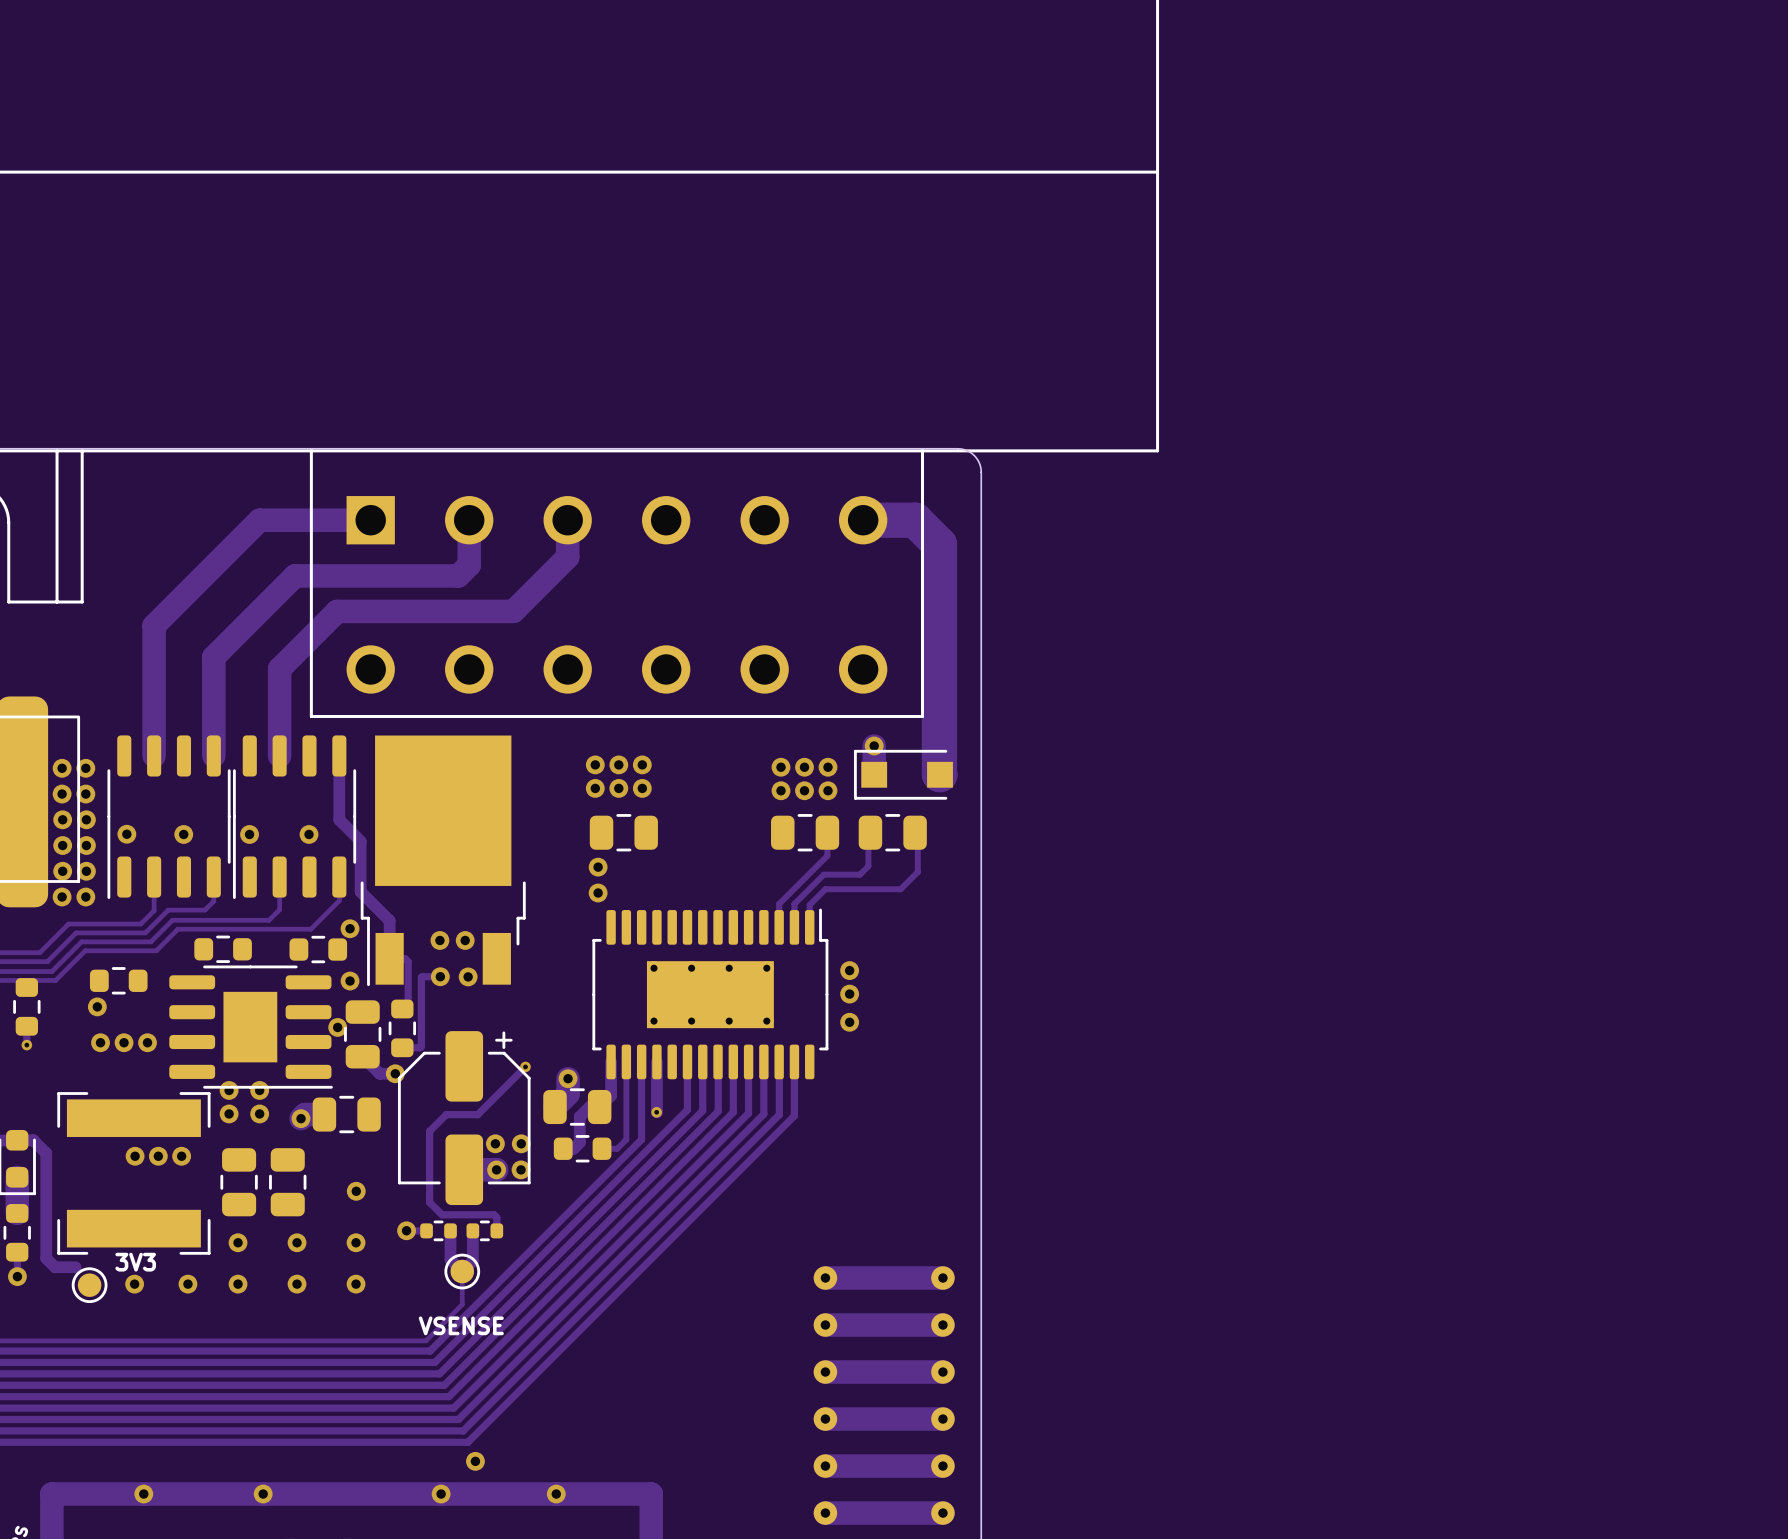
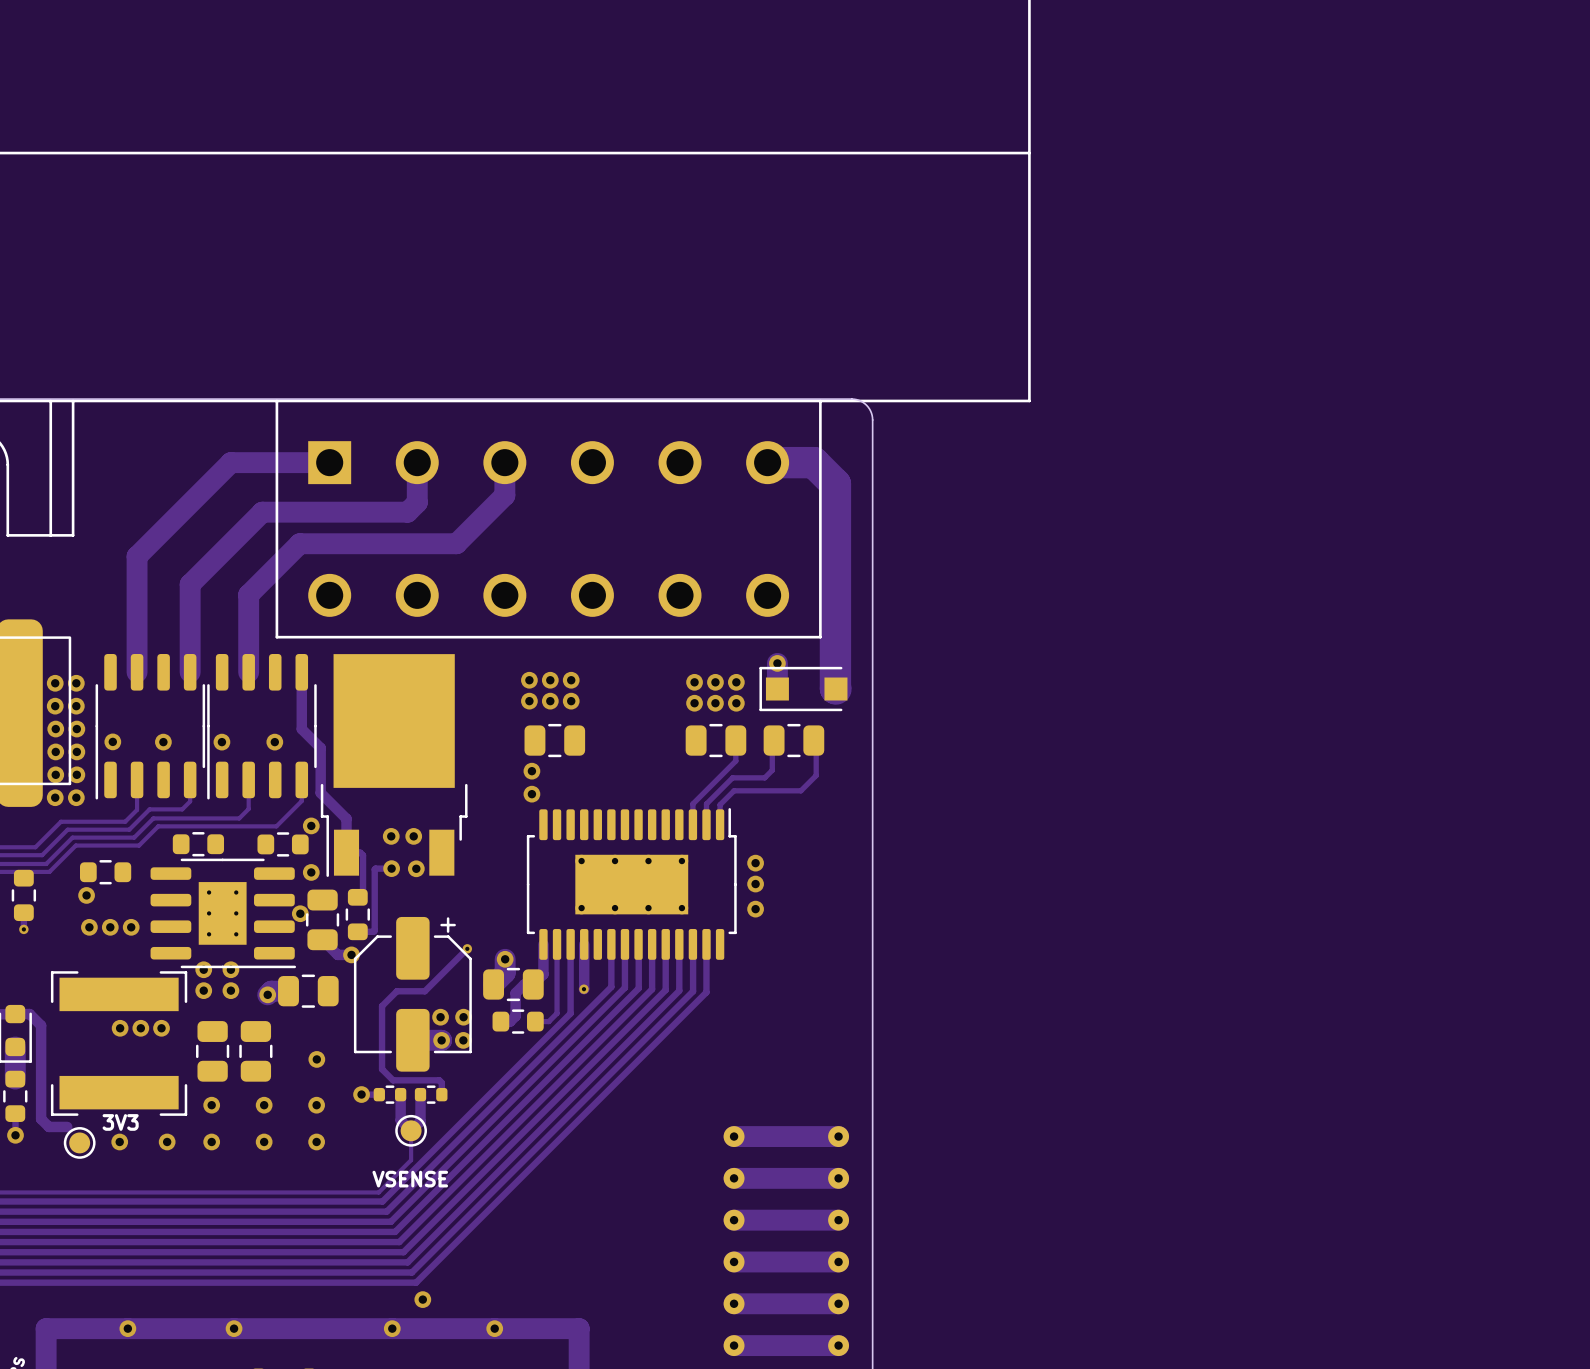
part footprint: [169, 965, 333, 1089] -> [150, 858, 297, 969]

